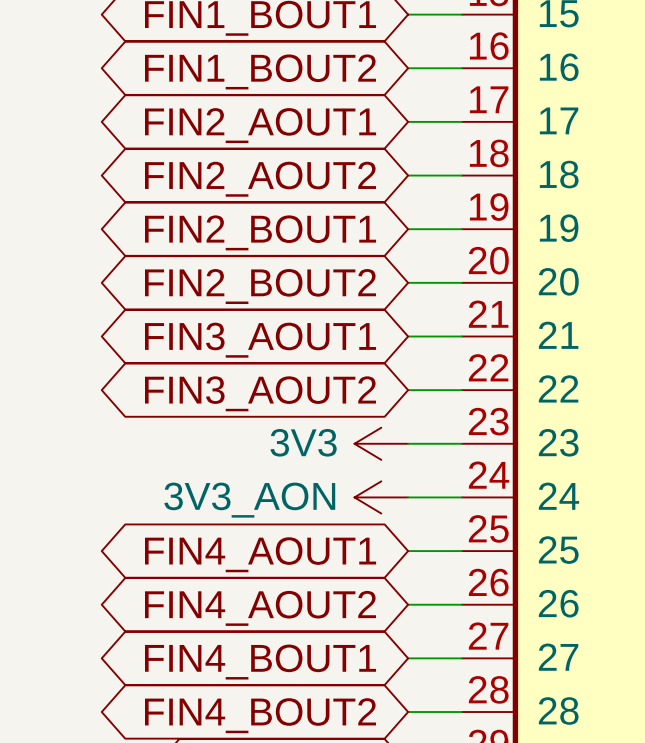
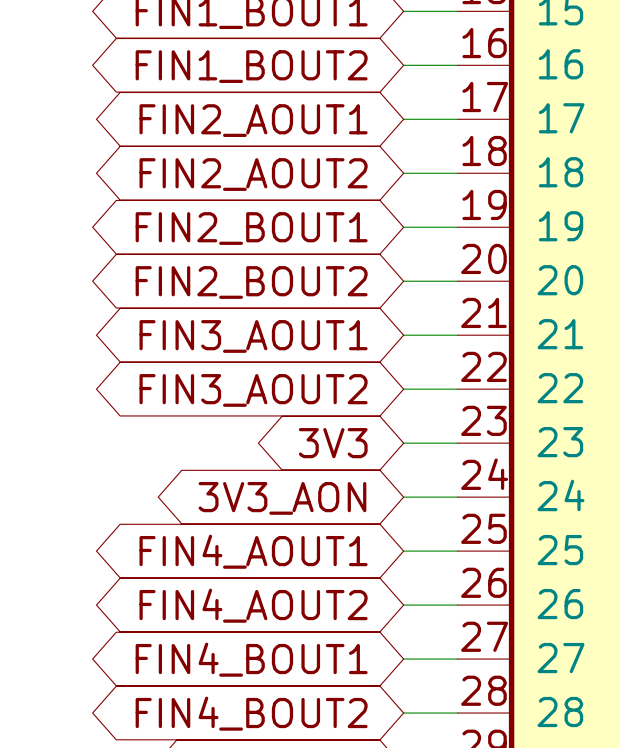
global label: none -> 3V3 (333, 443)
power symbol: 3V3 (381, 443) -> none
power symbol: 3V3_AON (381, 497) -> none
global label: none -> 3V3_AON (282, 498)

